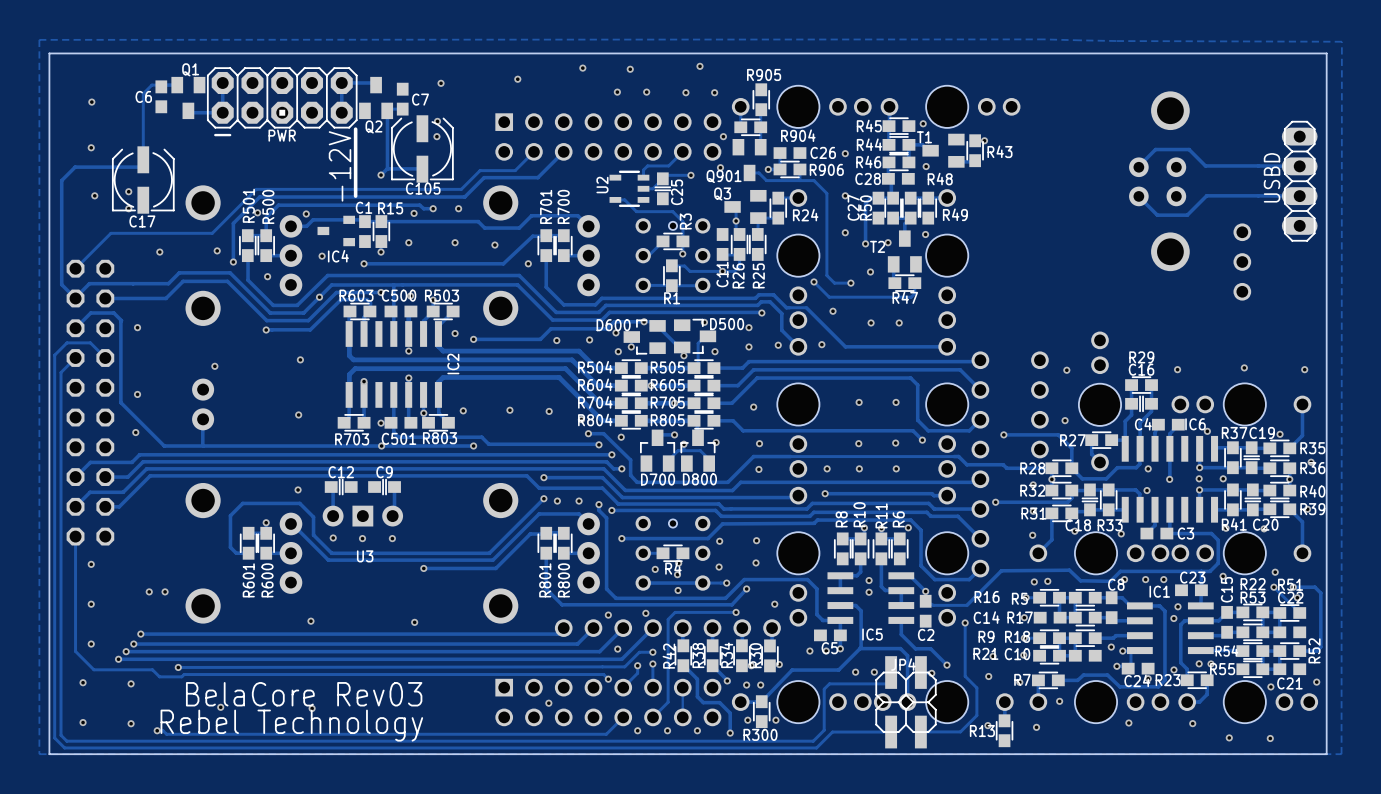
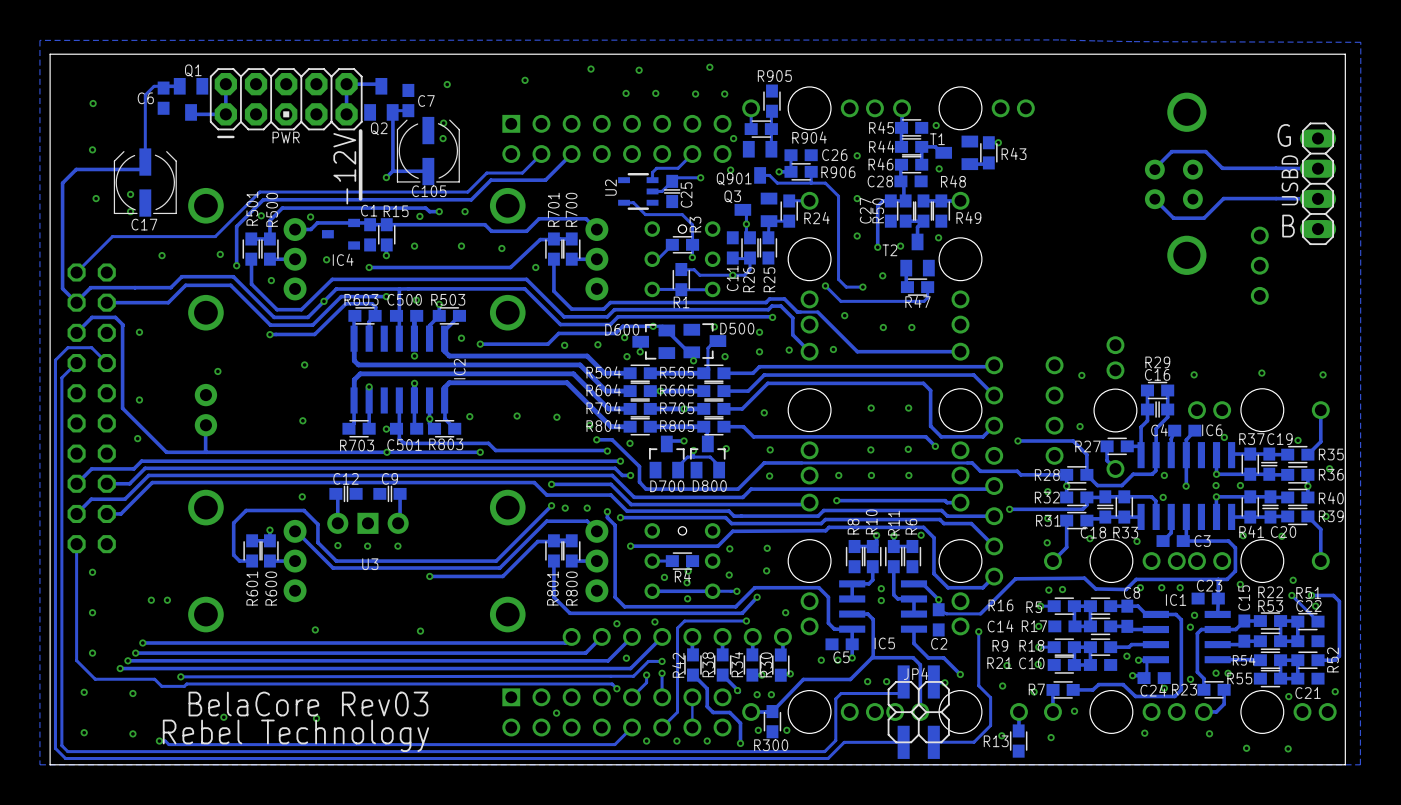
text: none -> G (1284, 135)
text: none -> B (1288, 226)

